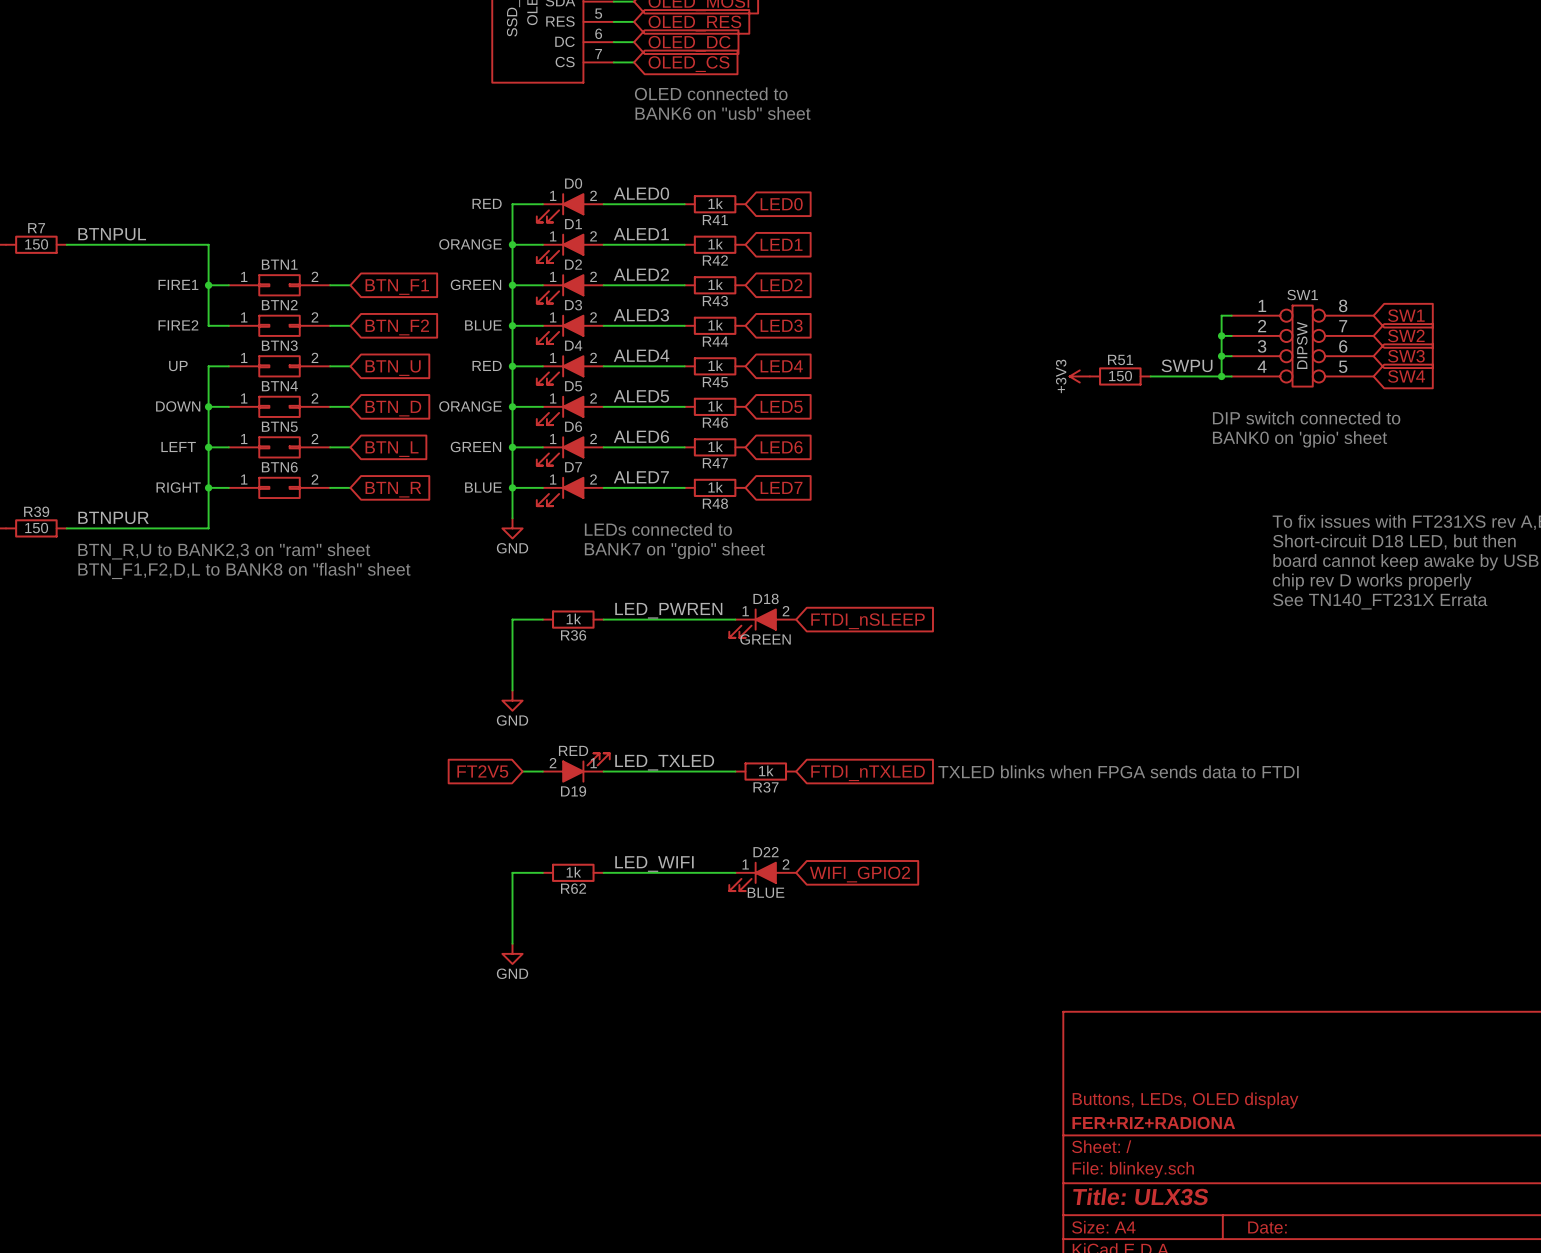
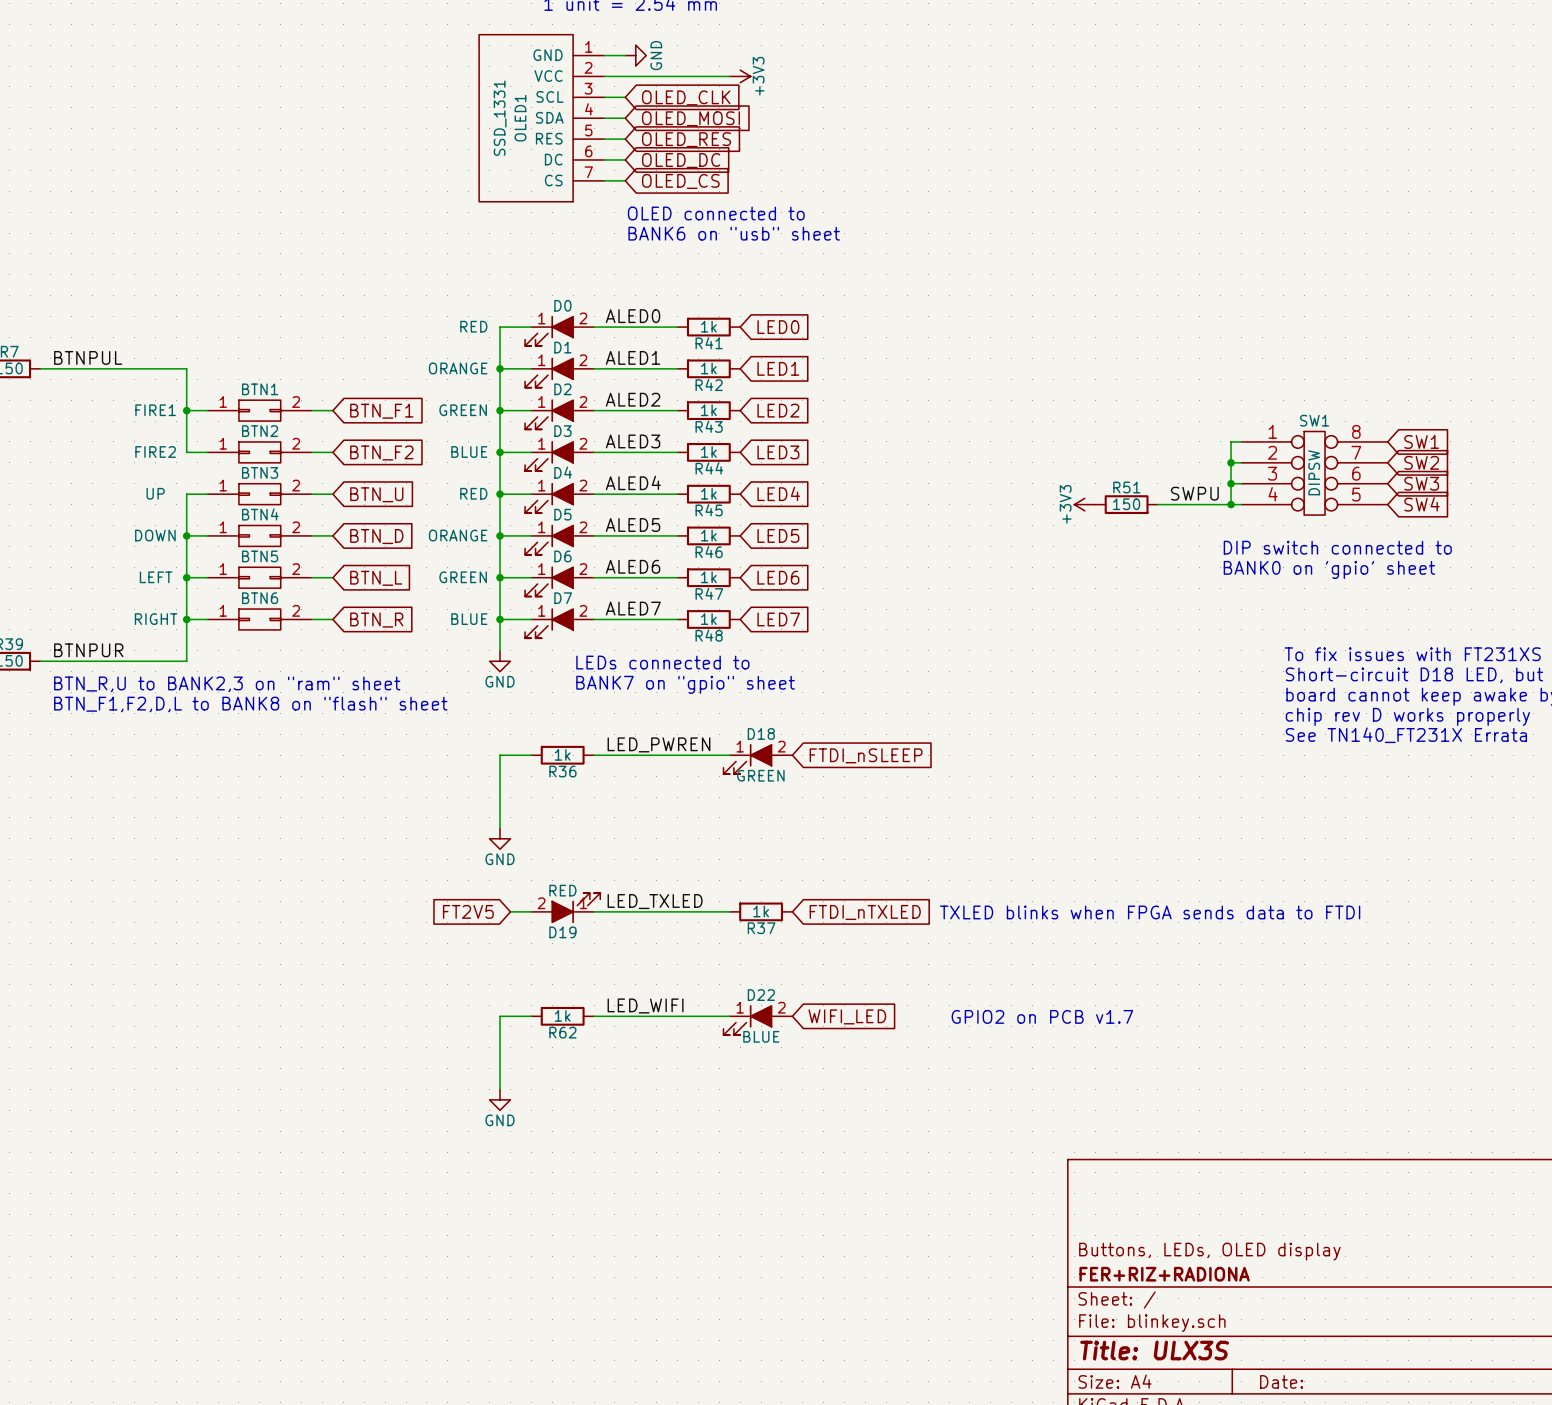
text: none -> GPIO2 on PCB v1.7 (1042, 1016)
global label: WIFI_GPIO2 (859, 874) -> WIFI_LED (847, 1016)

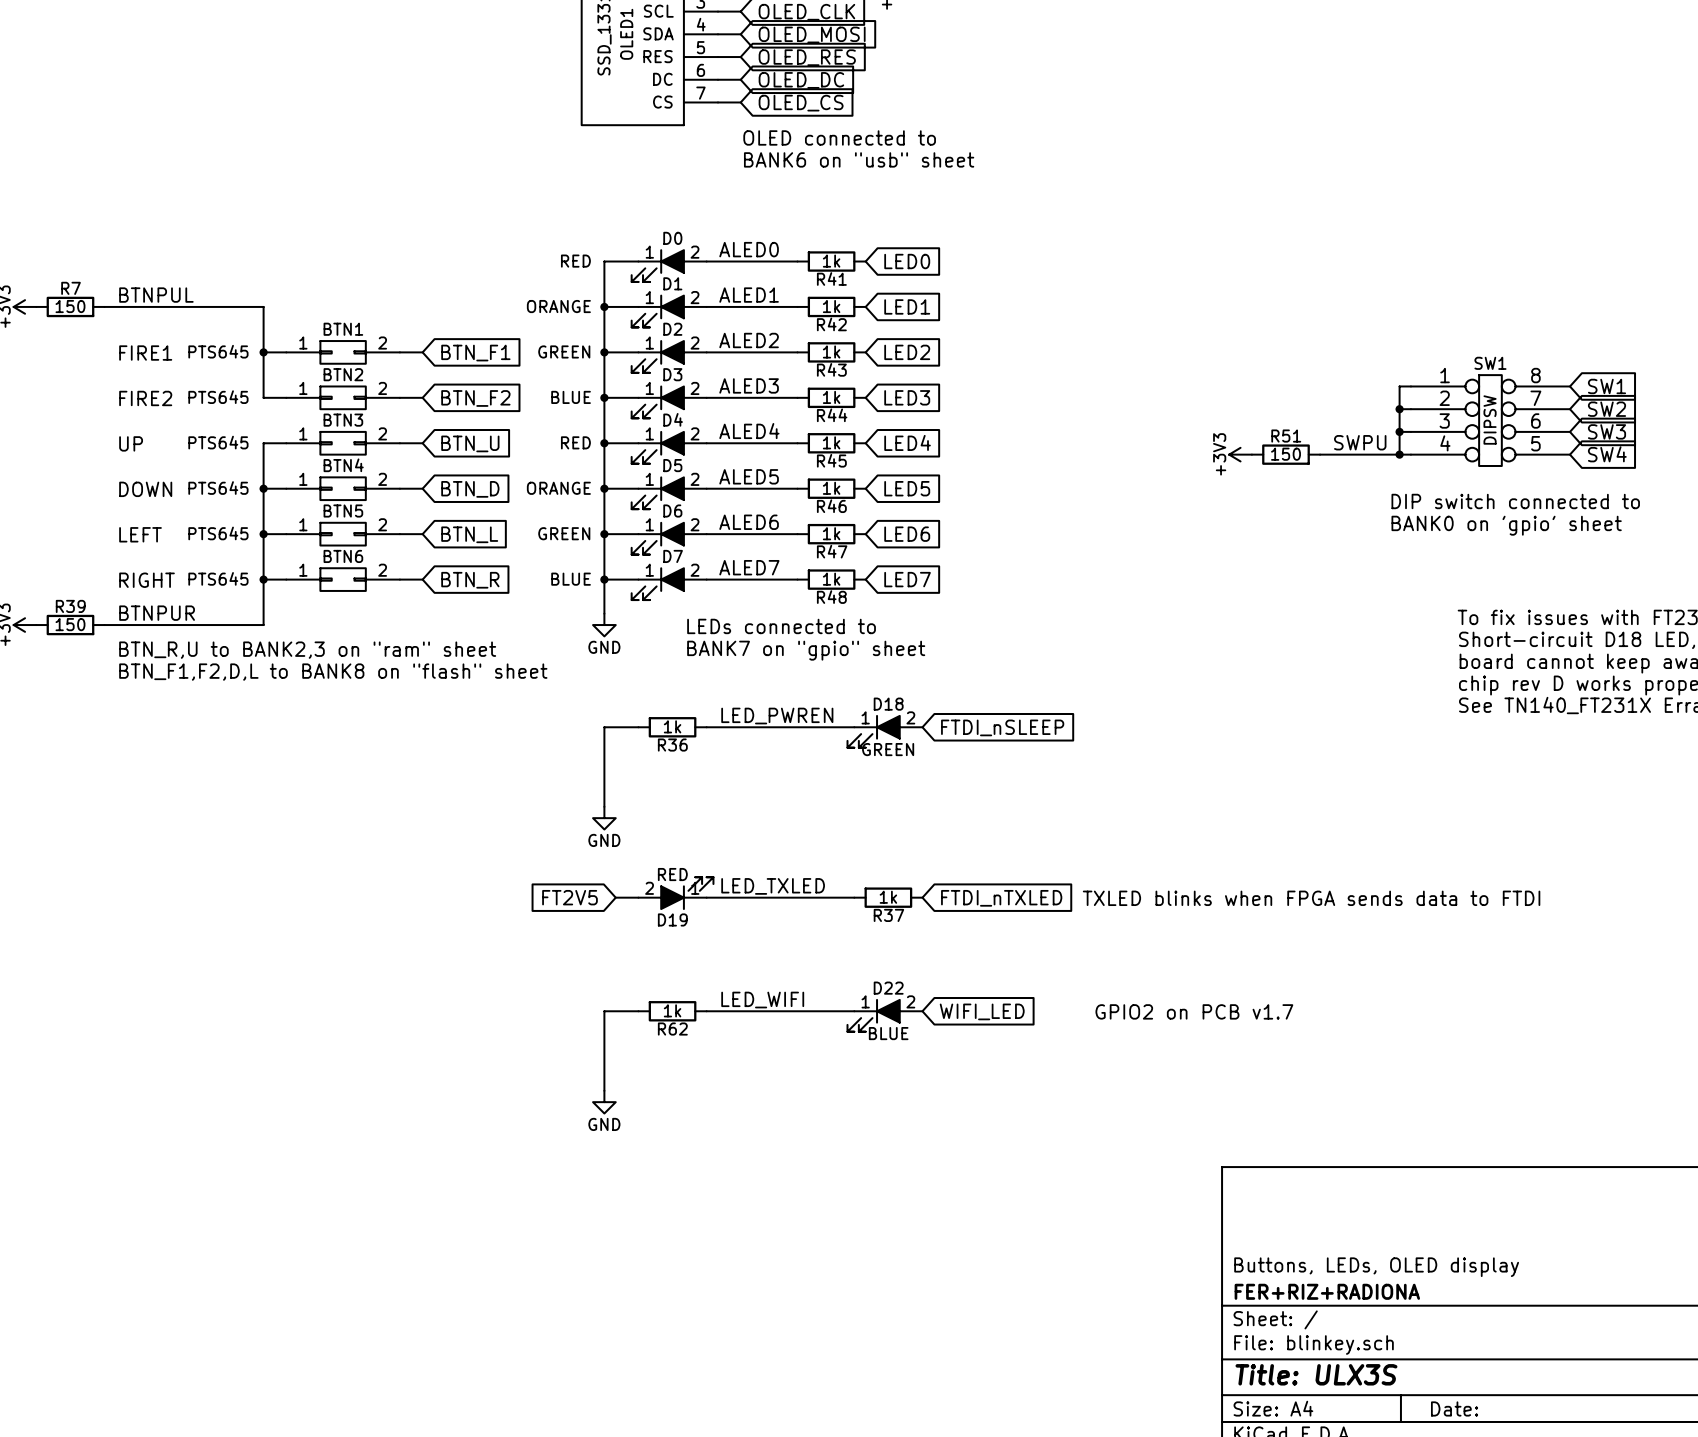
BTN1 value: FIRE1 (155, 410) -> PTS645 (218, 351)
text: none -> FIRE1 (145, 353)
text: none -> FIRE2 (145, 398)
BTN2 value: FIRE2 (155, 452) -> PTS645 (218, 397)
BTN3 value: UP (155, 493) -> PTS645 (218, 442)
text: none -> UP (131, 443)
BTN4 value: DOWN (155, 535) -> PTS645 (218, 488)
text: none -> DOWN (145, 489)
BTN5 value: LEFT (156, 577) -> PTS645 (218, 533)
text: none -> LEFT (140, 534)
BTN6 value: RIGHT (156, 619) -> PTS645 (218, 578)
text: none -> RIGHT (147, 580)

